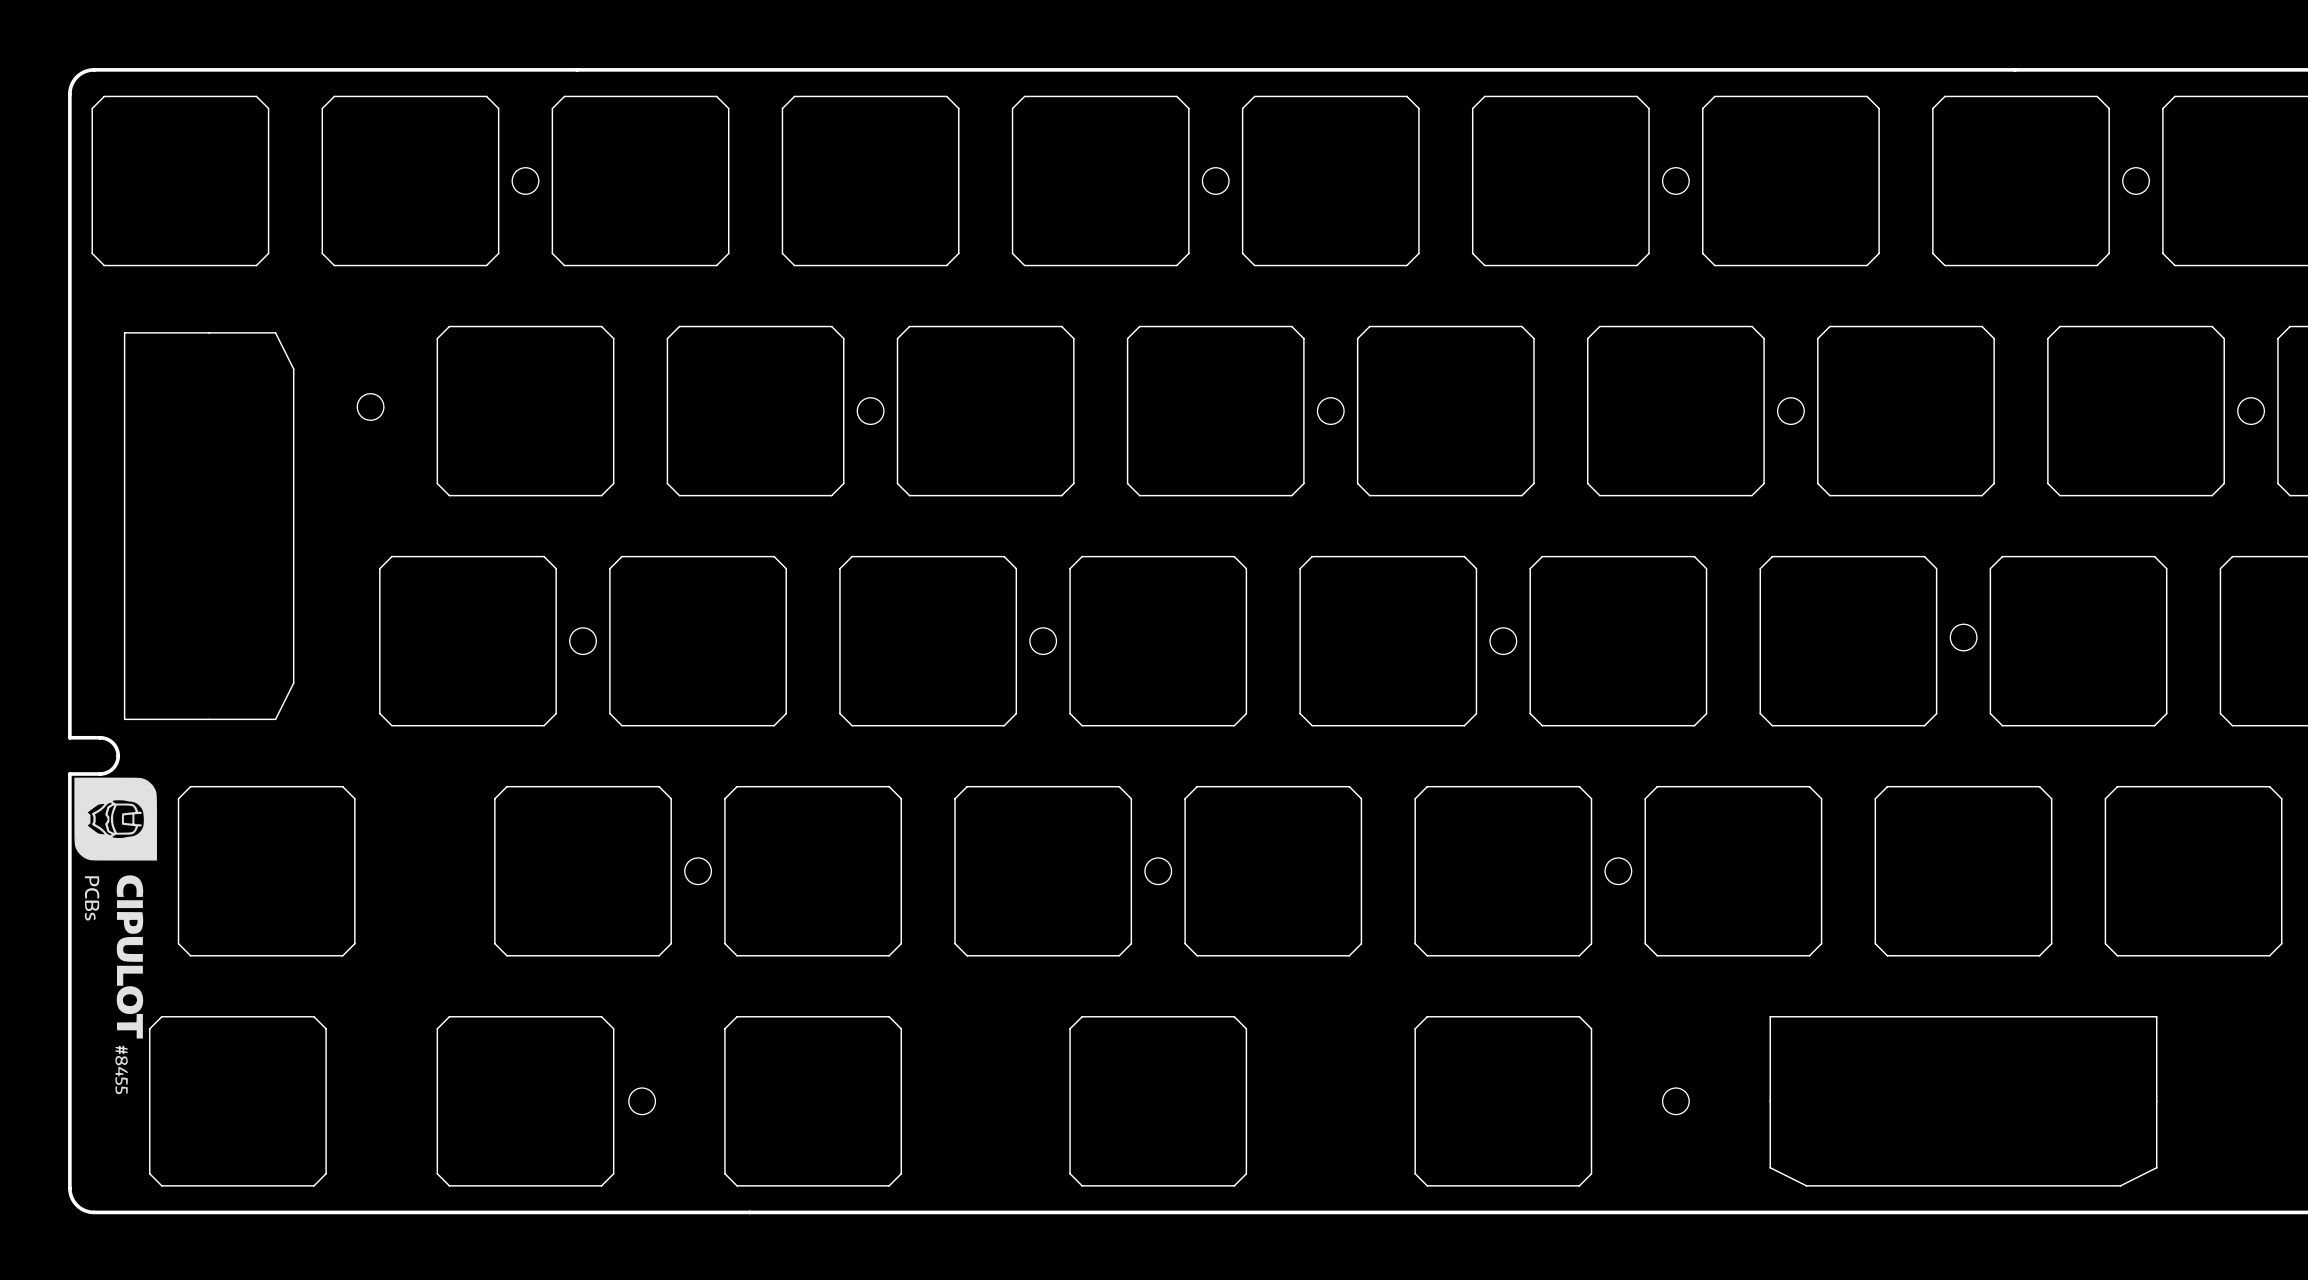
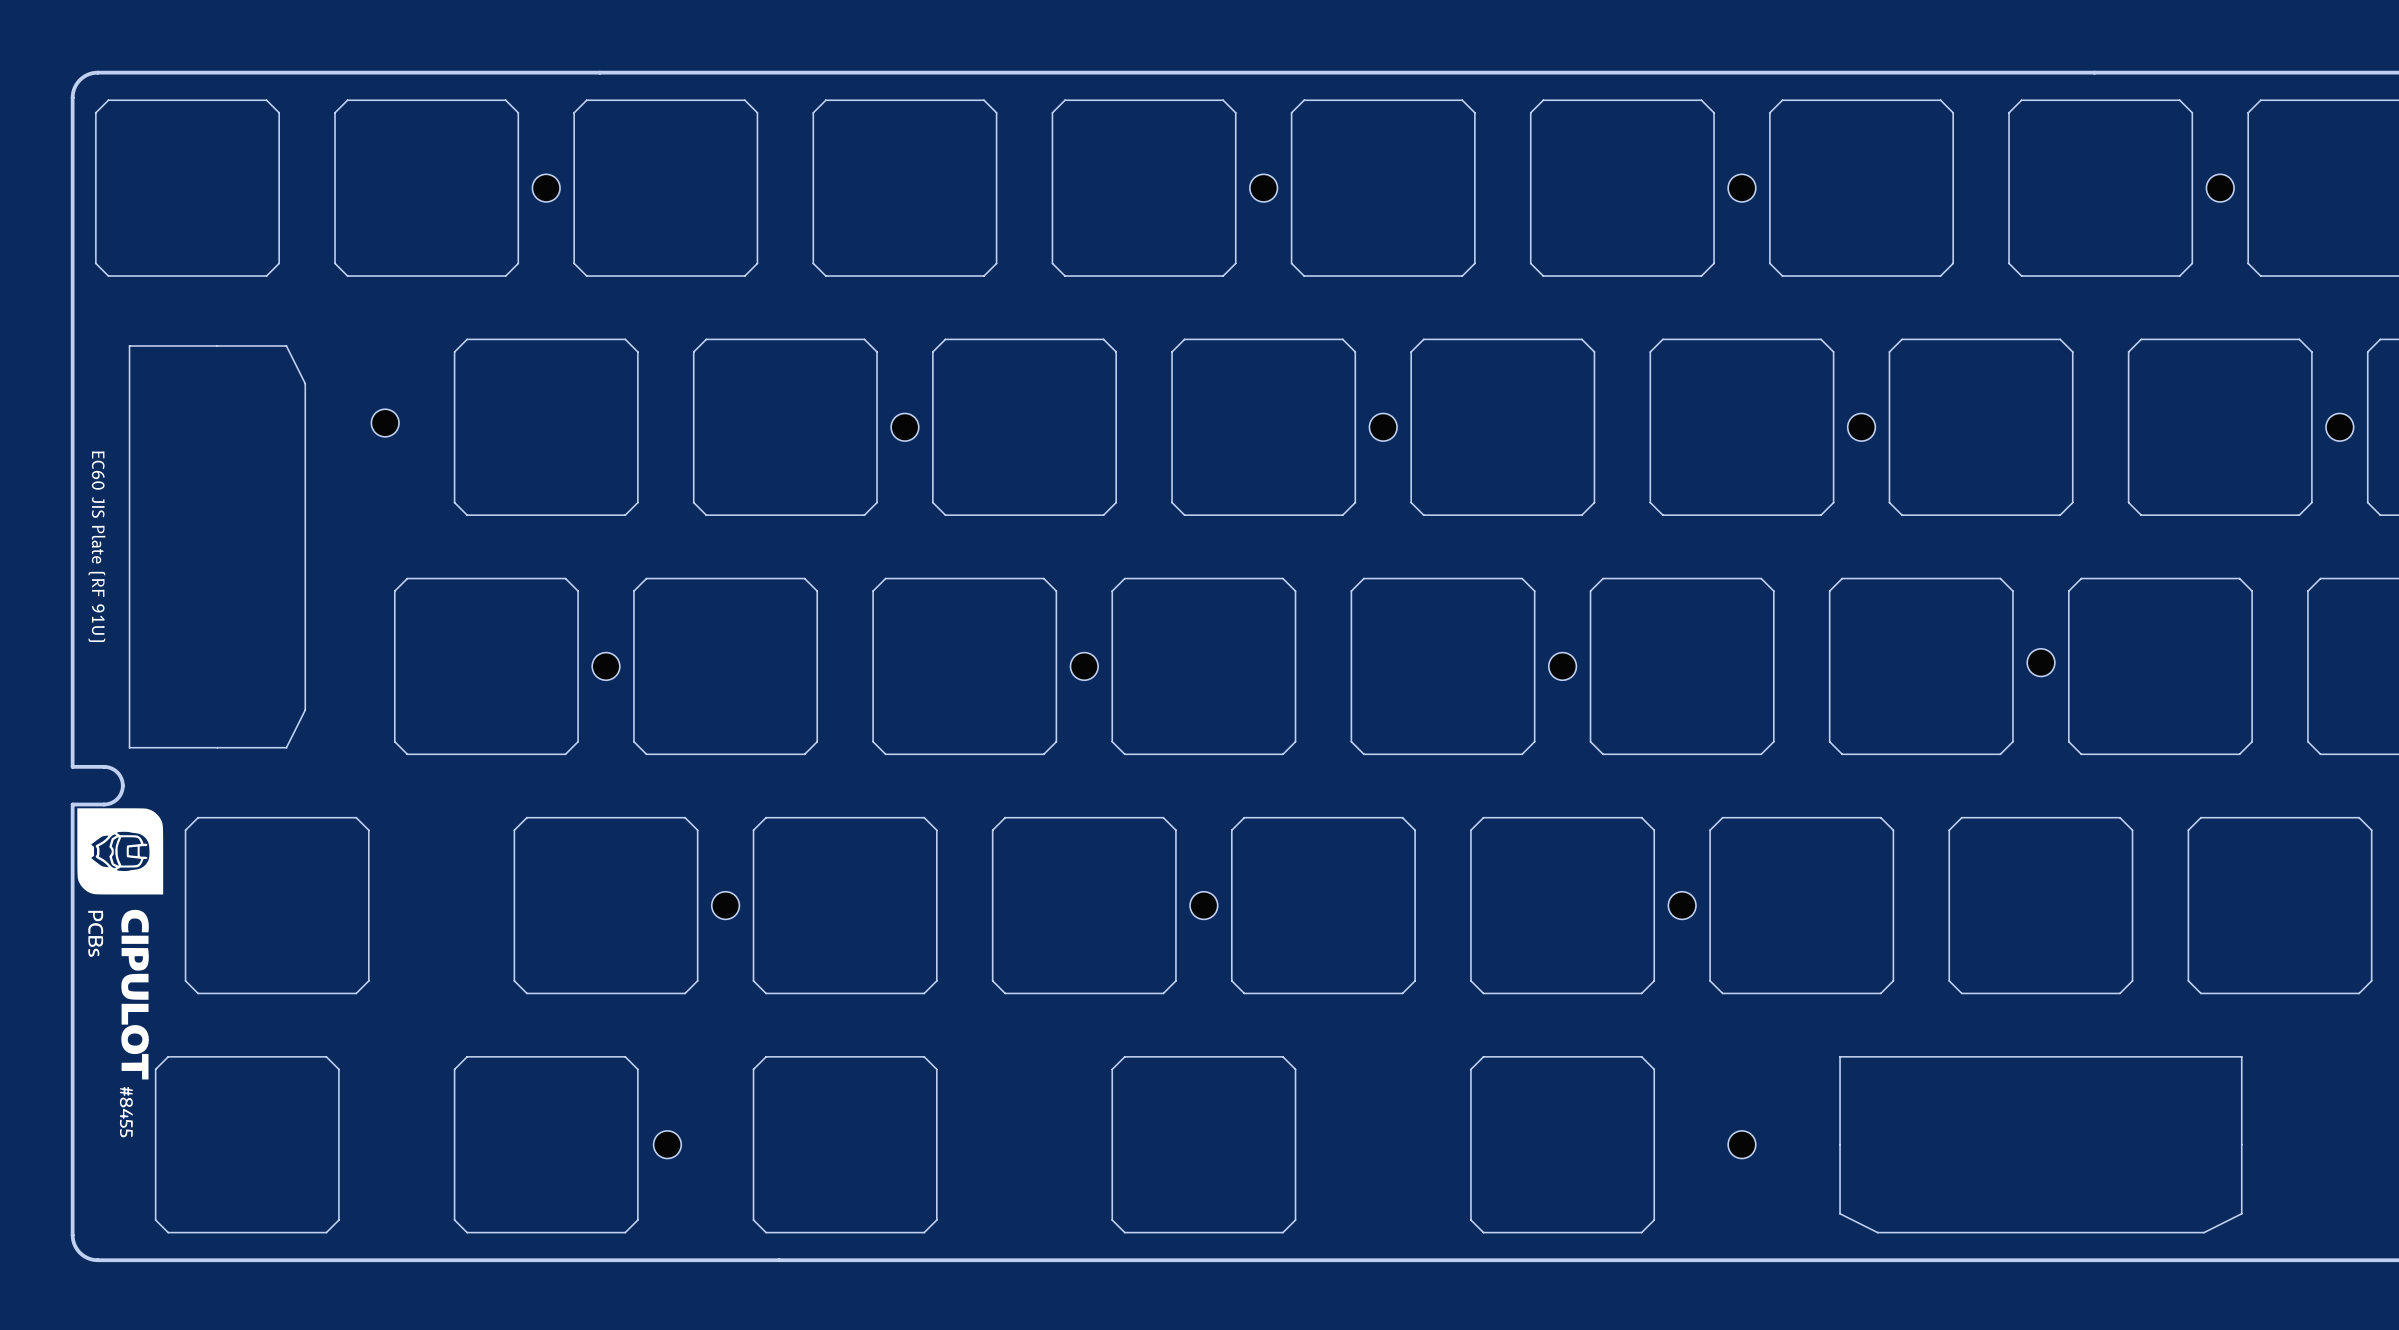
text: none -> EC60 JIS Plate (RF 91U) (96, 546)

